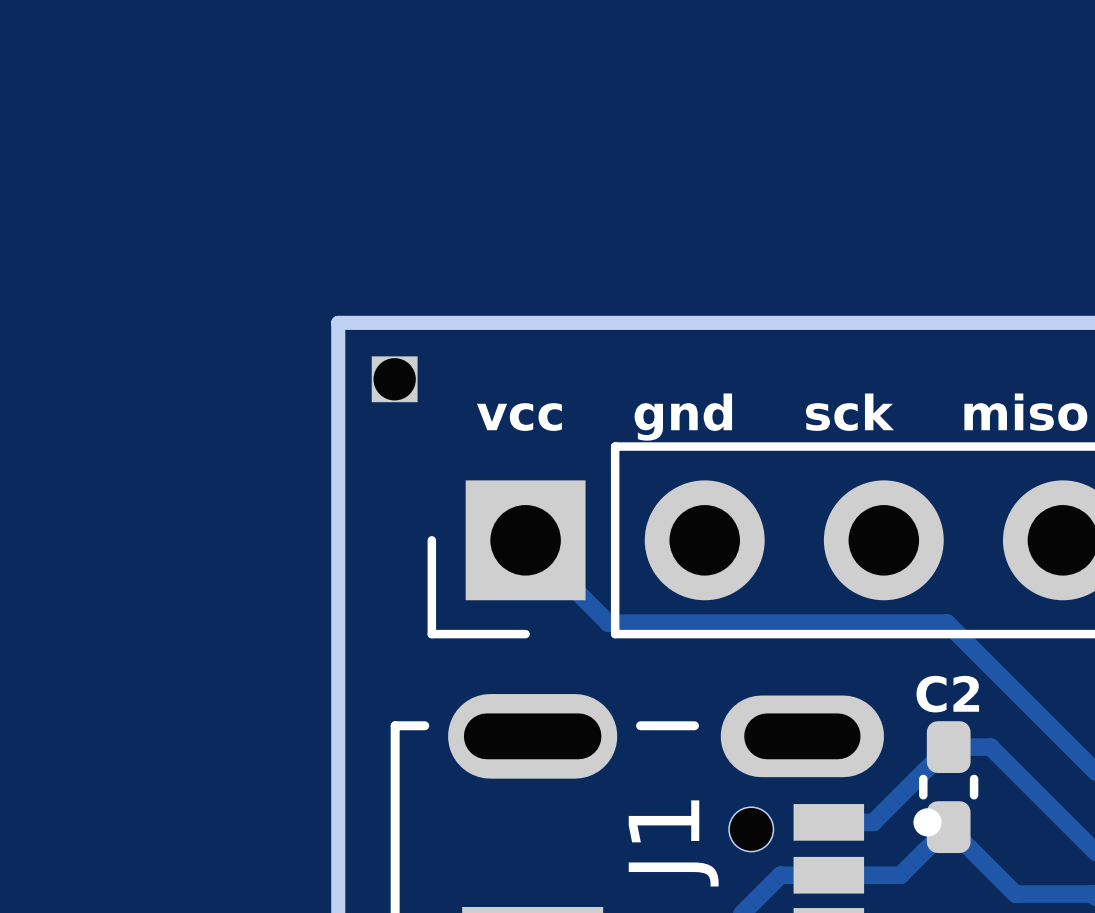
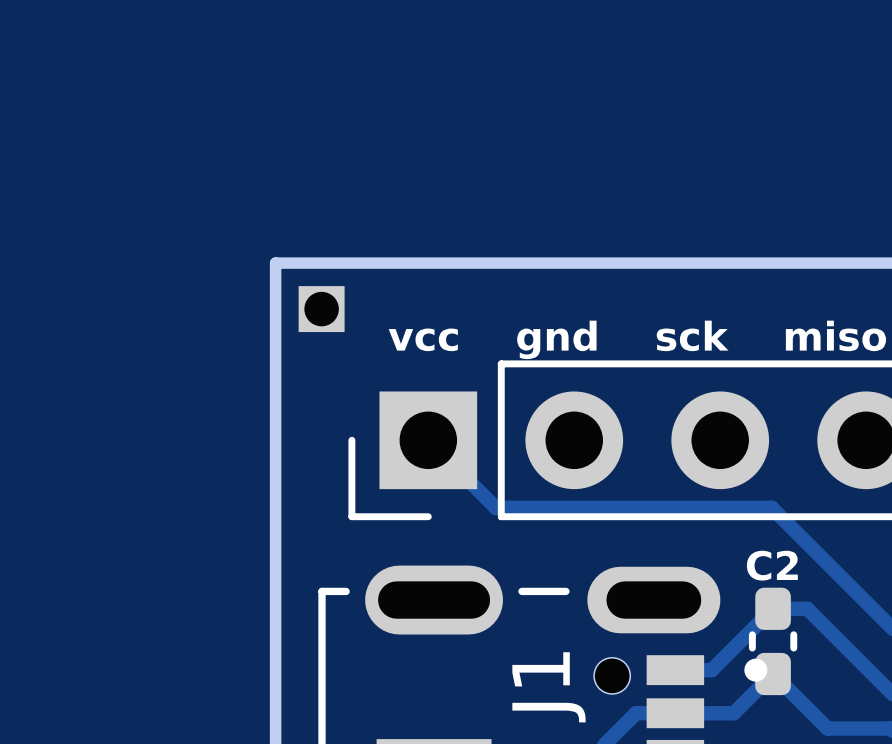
part footprint: [371, 356, 418, 403] -> [298, 286, 345, 333]

